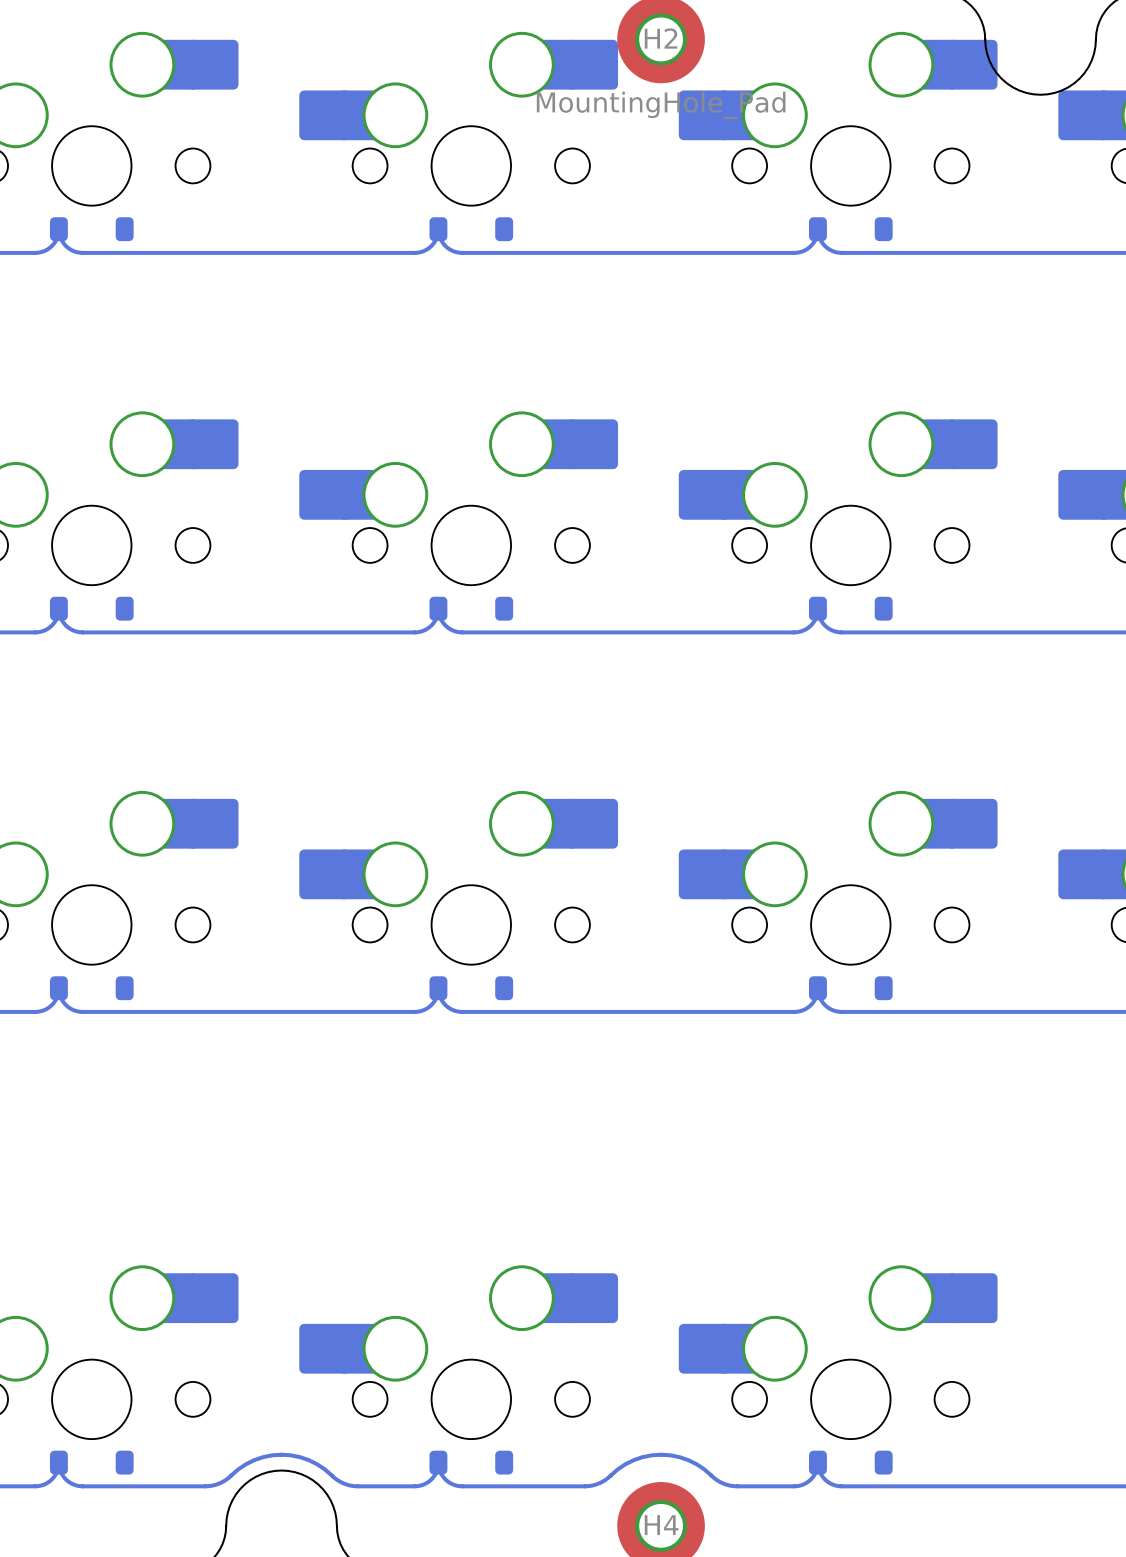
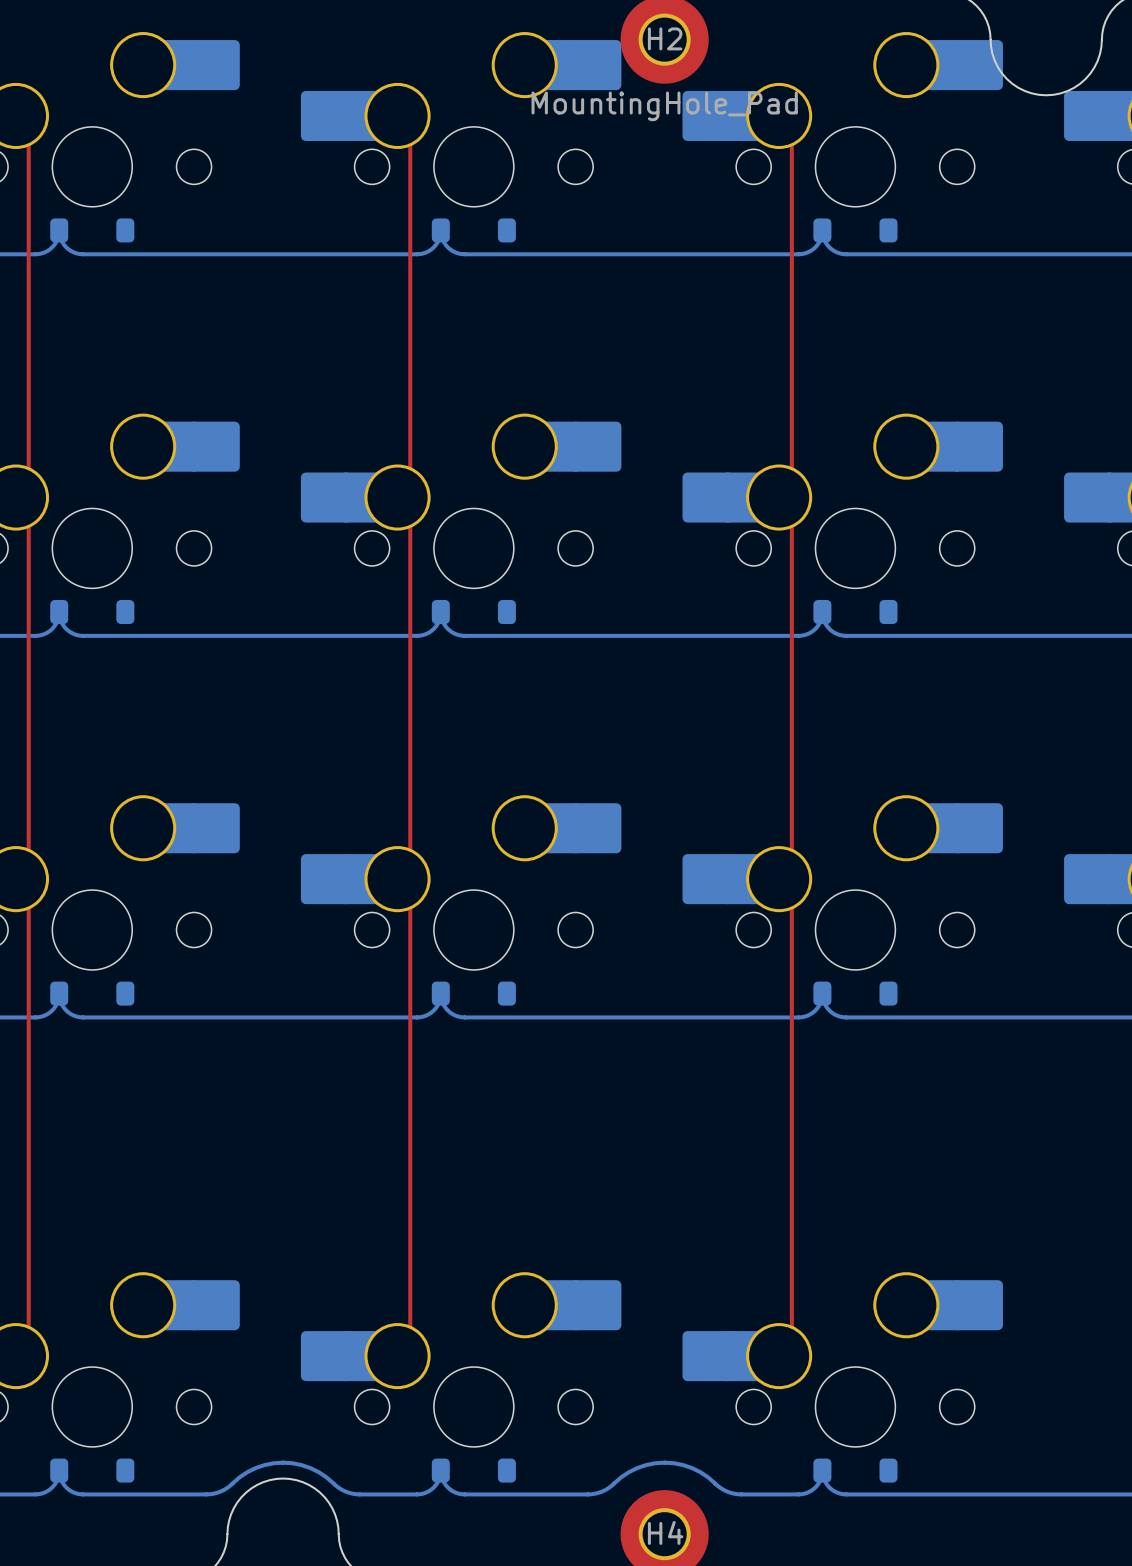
top track: none -> (15, 115) (24, 119) (28, 128) (28, 1343) (24, 1352) (15, 1356)
top track: none -> (397, 115) (406, 119) (410, 128) (410, 1343) (406, 1352) (397, 1356)
top track: none -> (779, 115) (788, 119) (791, 128) (791, 1343) (788, 1352) (779, 1356)

